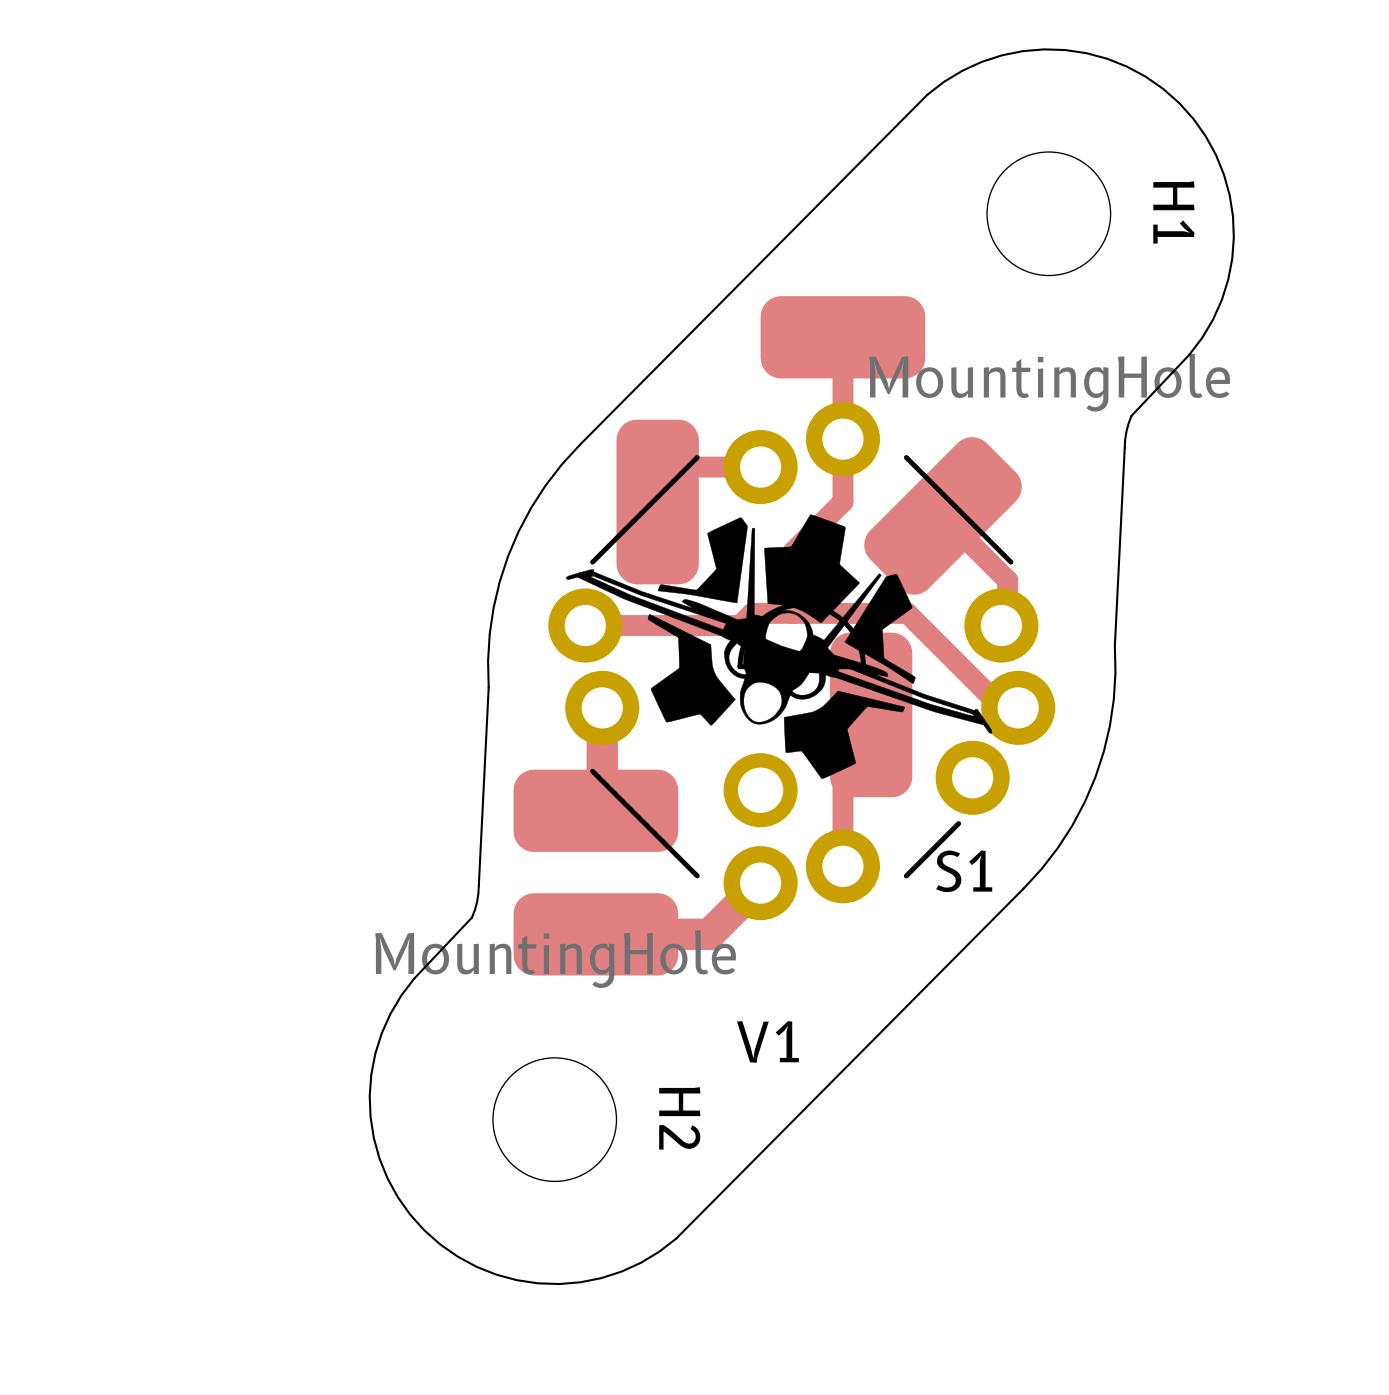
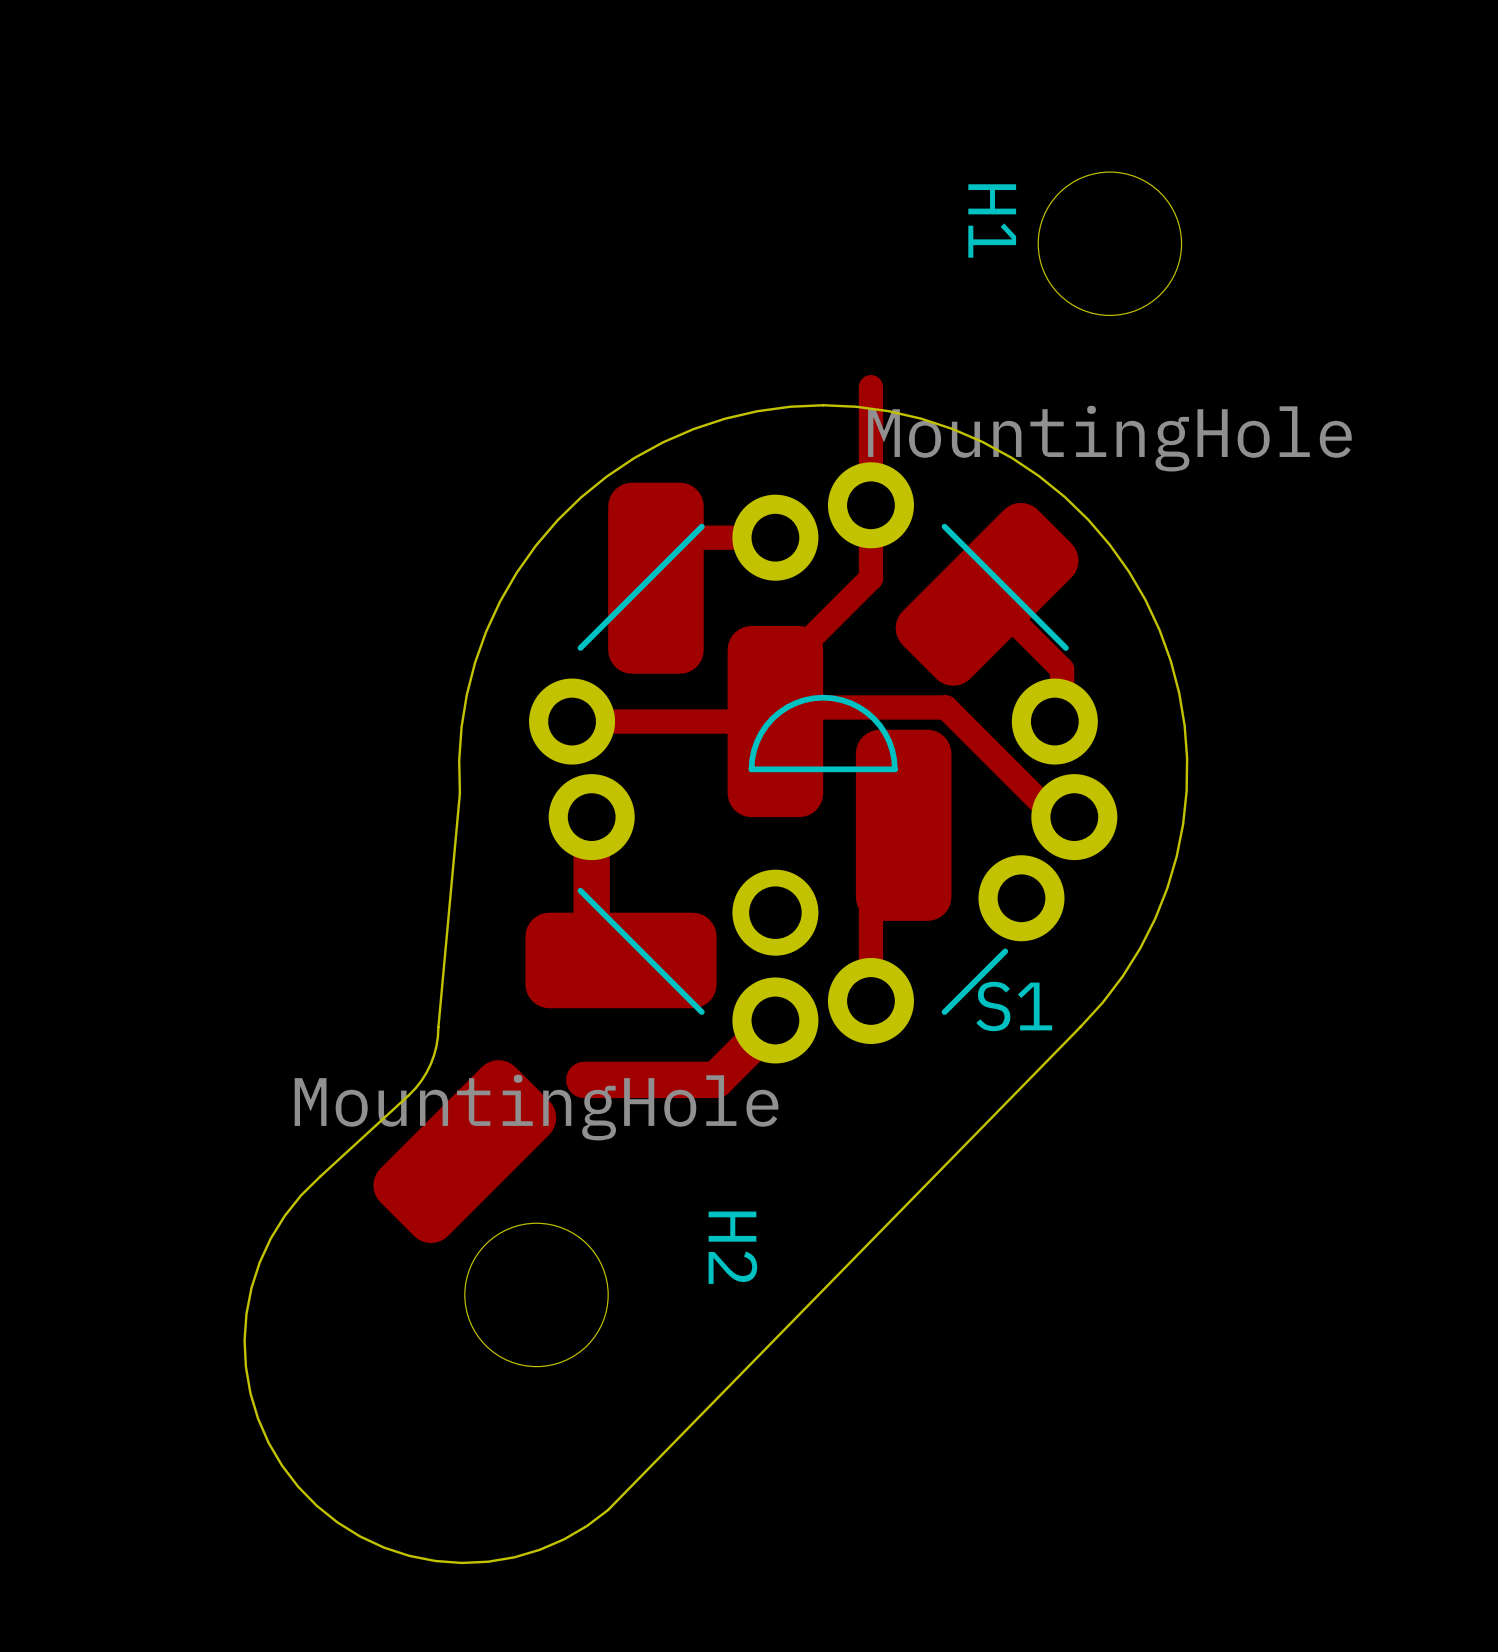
board edge: (927, 94) (561, 464) (531, 508) (508, 556) (499, 581) (489, 634) (477, 901) (472, 917) (414, 978) (390, 1013) (375, 1053) (369, 1095) (373, 1138) (387, 1178) (397, 1197) (424, 1230) (440, 1244) (457, 1256) (496, 1274) (538, 1283) (580, 1282) (601, 1278) (641, 1262) (676, 1238) (1041, 868) (1072, 825) (1095, 777) (1103, 751) (1113, 699) (1126, 431) (1131, 415) (1189, 354) (1202, 337) (1221, 300) (1232, 258) (1233, 237) (1229, 195) (1215, 154) (1205, 136) (1179, 103) (1145, 76) (1107, 58) (1065, 50) (1023, 51) (1002, 55) (962, 70) (927, 94) -> (823, 405) (856, 406) (920, 418) (982, 441) (1011, 457) (1064, 496) (1109, 544) (1128, 571) (1159, 630) (1170, 661) (1184, 725) (1186, 791) (1176, 856) (1167, 888) (1140, 948) (1102, 1002) (608, 1509) (587, 1525) (564, 1539) (539, 1549) (514, 1557) (488, 1561) (461, 1562) (435, 1560) (409, 1555) (383, 1547) (359, 1536) (337, 1522) (316, 1505) (298, 1486) (282, 1465) (268, 1442) (258, 1418) (250, 1393) (245, 1366) (244, 1340) (246, 1314) (251, 1287) (259, 1262) (270, 1238) (284, 1216) (301, 1195) (320, 1176) (415, 1088) (426, 1072) (434, 1055) (437, 1036) (459, 793) (459, 760) (461, 727) (466, 694) (475, 662) (486, 631) (500, 601) (516, 572) (535, 545) (557, 520) (581, 497) (606, 476) (634, 458) (663, 442) (693, 429) (725, 418) (757, 411) (790, 406) (823, 405)
H1 name position: H1 (1173, 212) -> H1 (992, 220)
part: (842, 337) -> none
drawing: [565, 514, 993, 779] -> none
part: none -> (775, 721)
part position: (595, 810) -> (621, 960)
part: (595, 934) -> none
part: none -> (464, 1151)
text: V1 (767, 1041) -> none
H2 name position: H2 (679, 1118) -> H2 (732, 1247)

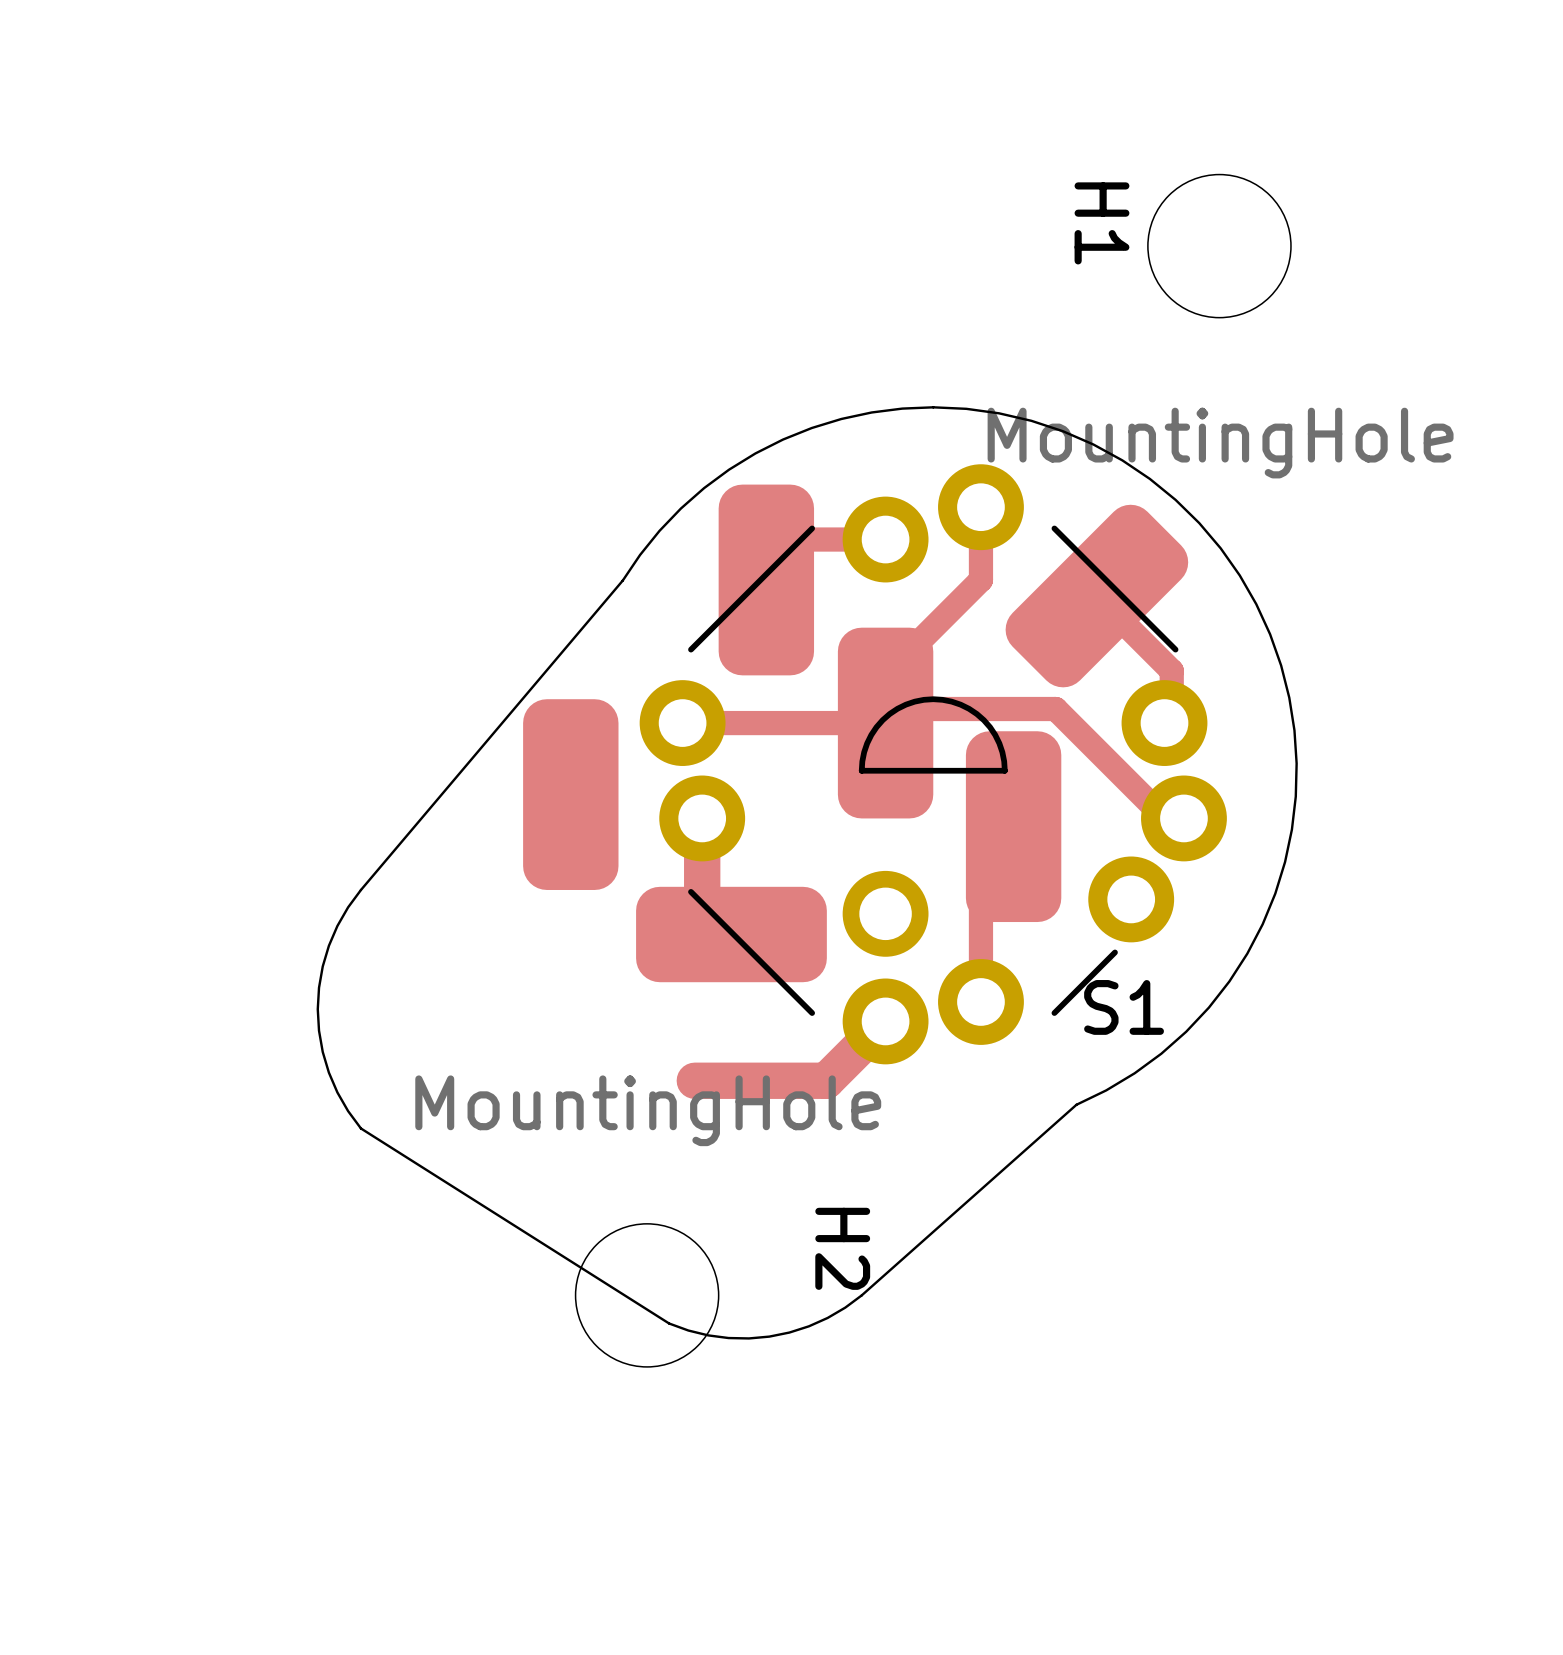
top track: (870, 387) (870, 505) -> none
board edge: (823, 405) (790, 406) (757, 411) (725, 418) (693, 429) (663, 442) (634, 458) (606, 476) (581, 497) (557, 520) (535, 545) (516, 572) (500, 601) (486, 631) (475, 662) (466, 694) (461, 727) (459, 760) (459, 793) (437, 1036) (434, 1055) (426, 1072) (415, 1088) (320, 1176) (301, 1195) (284, 1216) (270, 1238) (259, 1262) (251, 1287) (246, 1314) (244, 1340) (245, 1366) (250, 1393) (258, 1418) (268, 1442) (282, 1465) (298, 1486) (316, 1505) (337, 1522) (359, 1536) (383, 1547) (409, 1555) (435, 1560) (461, 1562) (488, 1561) (514, 1557) (539, 1549) (564, 1539) (587, 1525) (608, 1509) (1102, 1002) (1140, 948) (1167, 888) (1176, 856) (1186, 791) (1184, 725) (1170, 661) (1159, 630) (1128, 571) (1109, 544) (1064, 496) (1011, 457) (982, 441) (920, 418) (856, 406) (823, 405) -> (933, 407) (966, 408) (999, 413) (1031, 420) (1062, 431) (1093, 444) (1122, 460) (1149, 478) (1175, 499) (1199, 523) (1220, 548) (1239, 575) (1256, 604) (1270, 634) (1281, 665) (1289, 697) (1294, 730) (1296, 763) (1295, 796) (1291, 829) (1285, 861) (1275, 893) (1262, 924) (1247, 953) (1229, 981) (1208, 1007) (1186, 1031) (1161, 1053) (1134, 1073) (1106, 1090) (1076, 1104) (861, 1295) (827, 1317) (789, 1332) (749, 1338) (708, 1335) (688, 1330) (669, 1323) (360, 1128) (337, 1092) (322, 1051) (317, 1009) (322, 966) (337, 926) (360, 889) (622, 580) (659, 530) (680, 508) (729, 469) (783, 439) (841, 418) (902, 408) (933, 407)
part: none -> (570, 794)
part position: (621, 960) -> (731, 934)
part: (464, 1151) -> none

